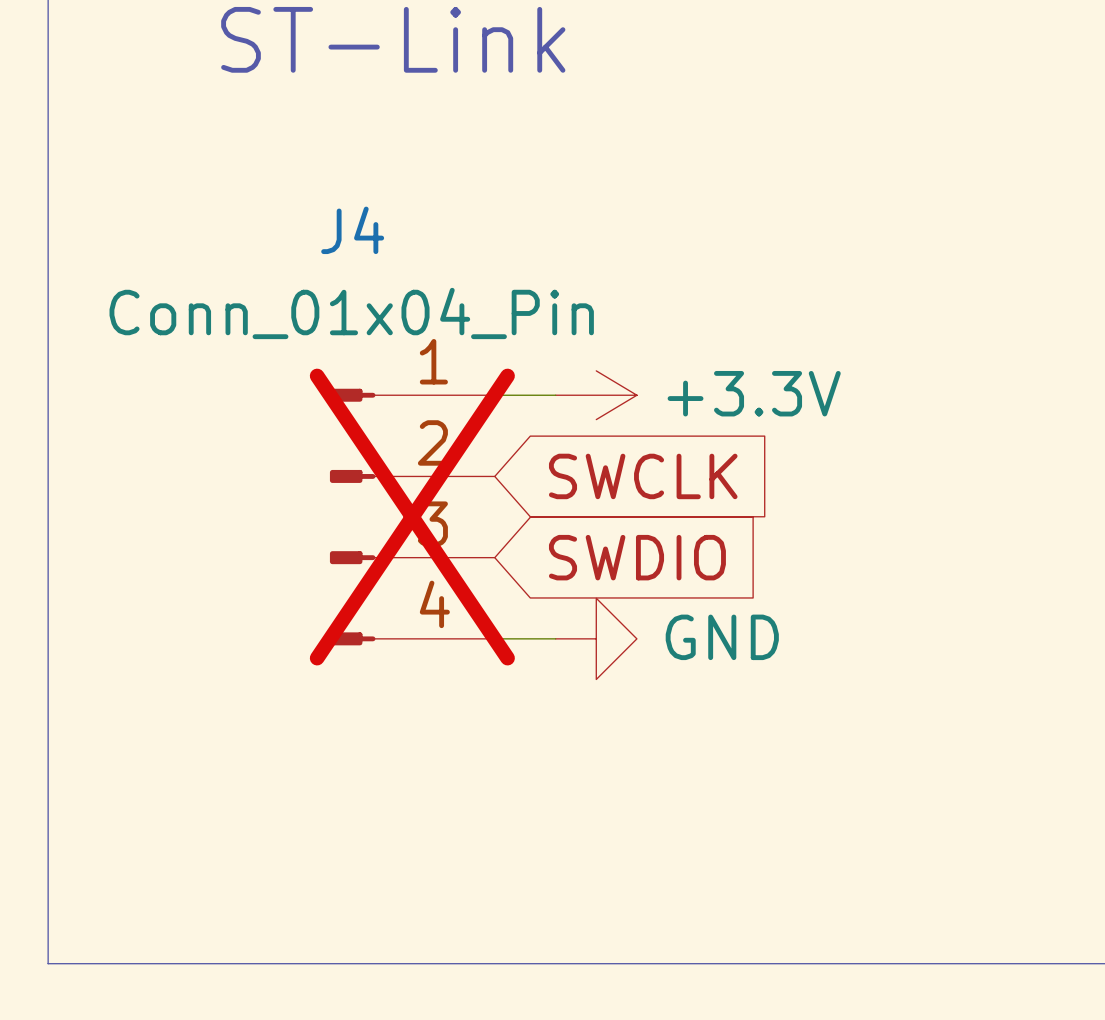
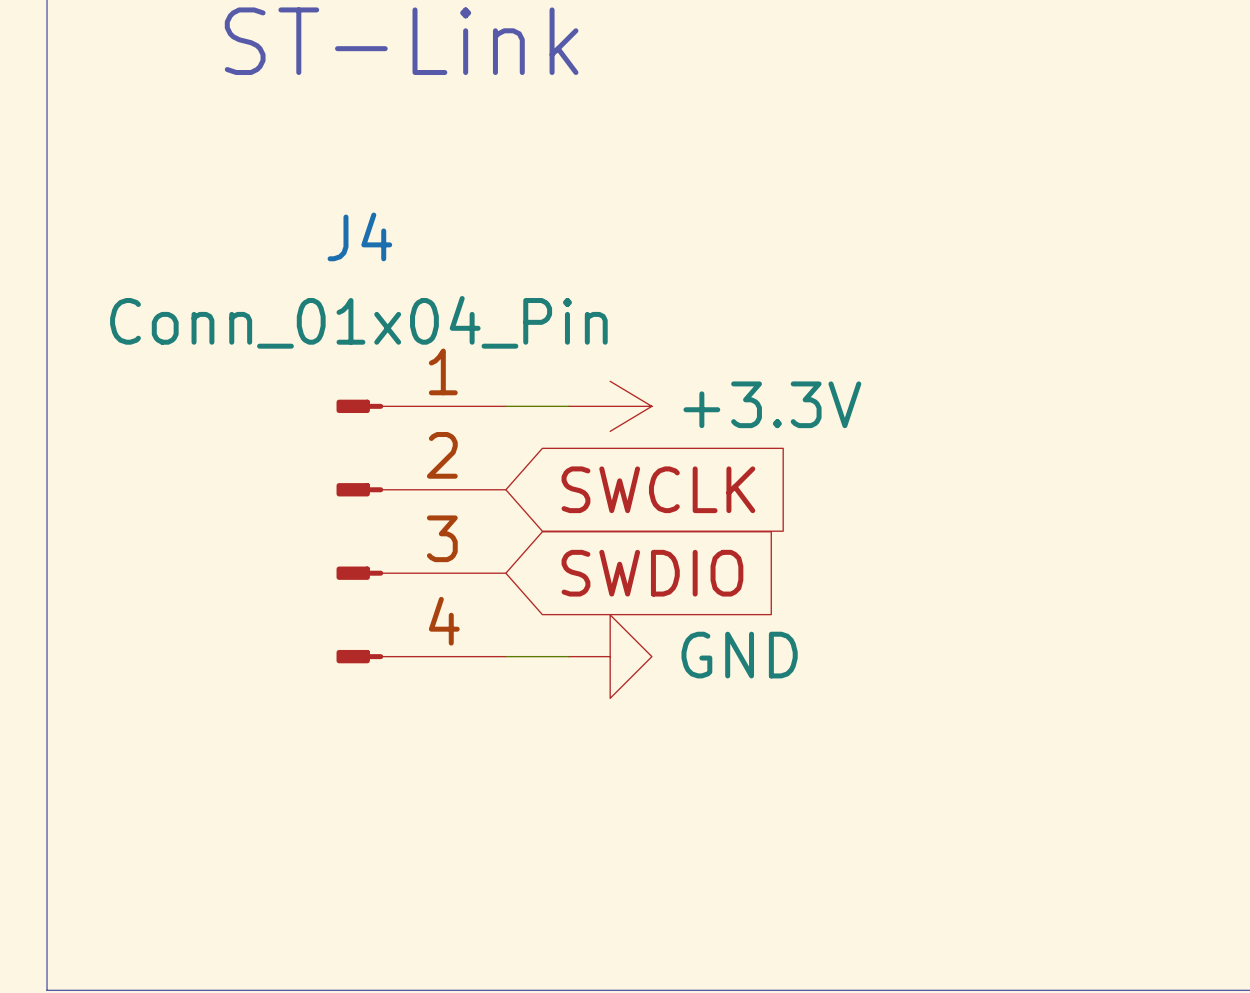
J4 do-not-place cross: (412, 517) -> none

